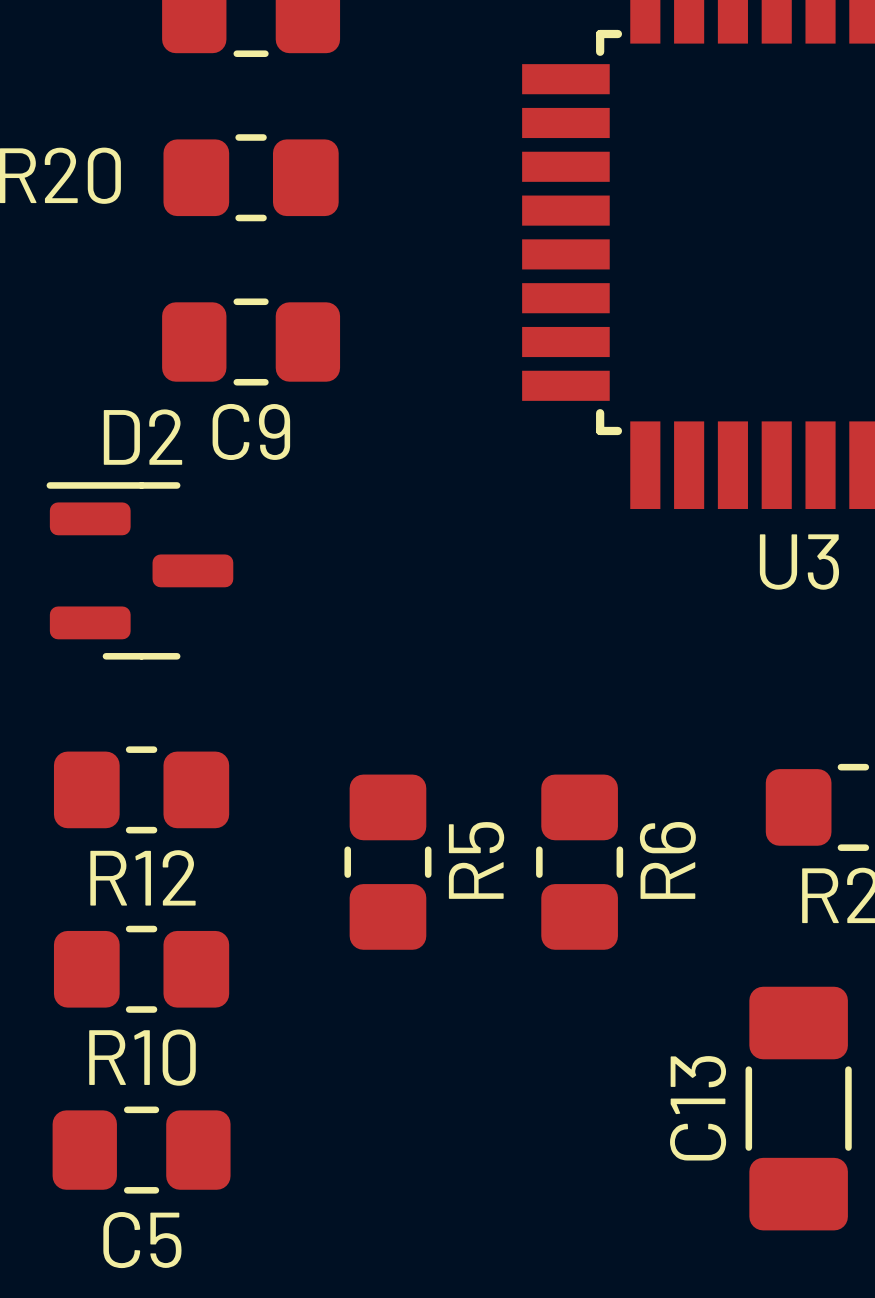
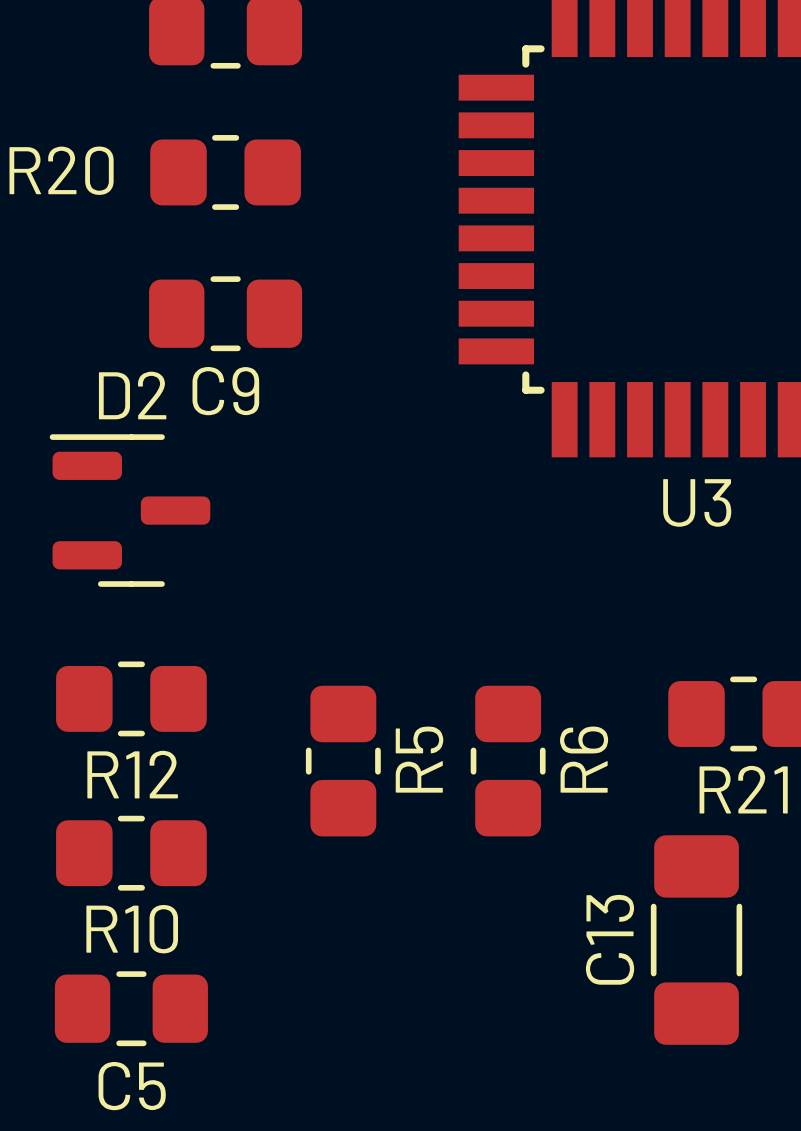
C13 position: (798, 1108) -> (696, 940)

